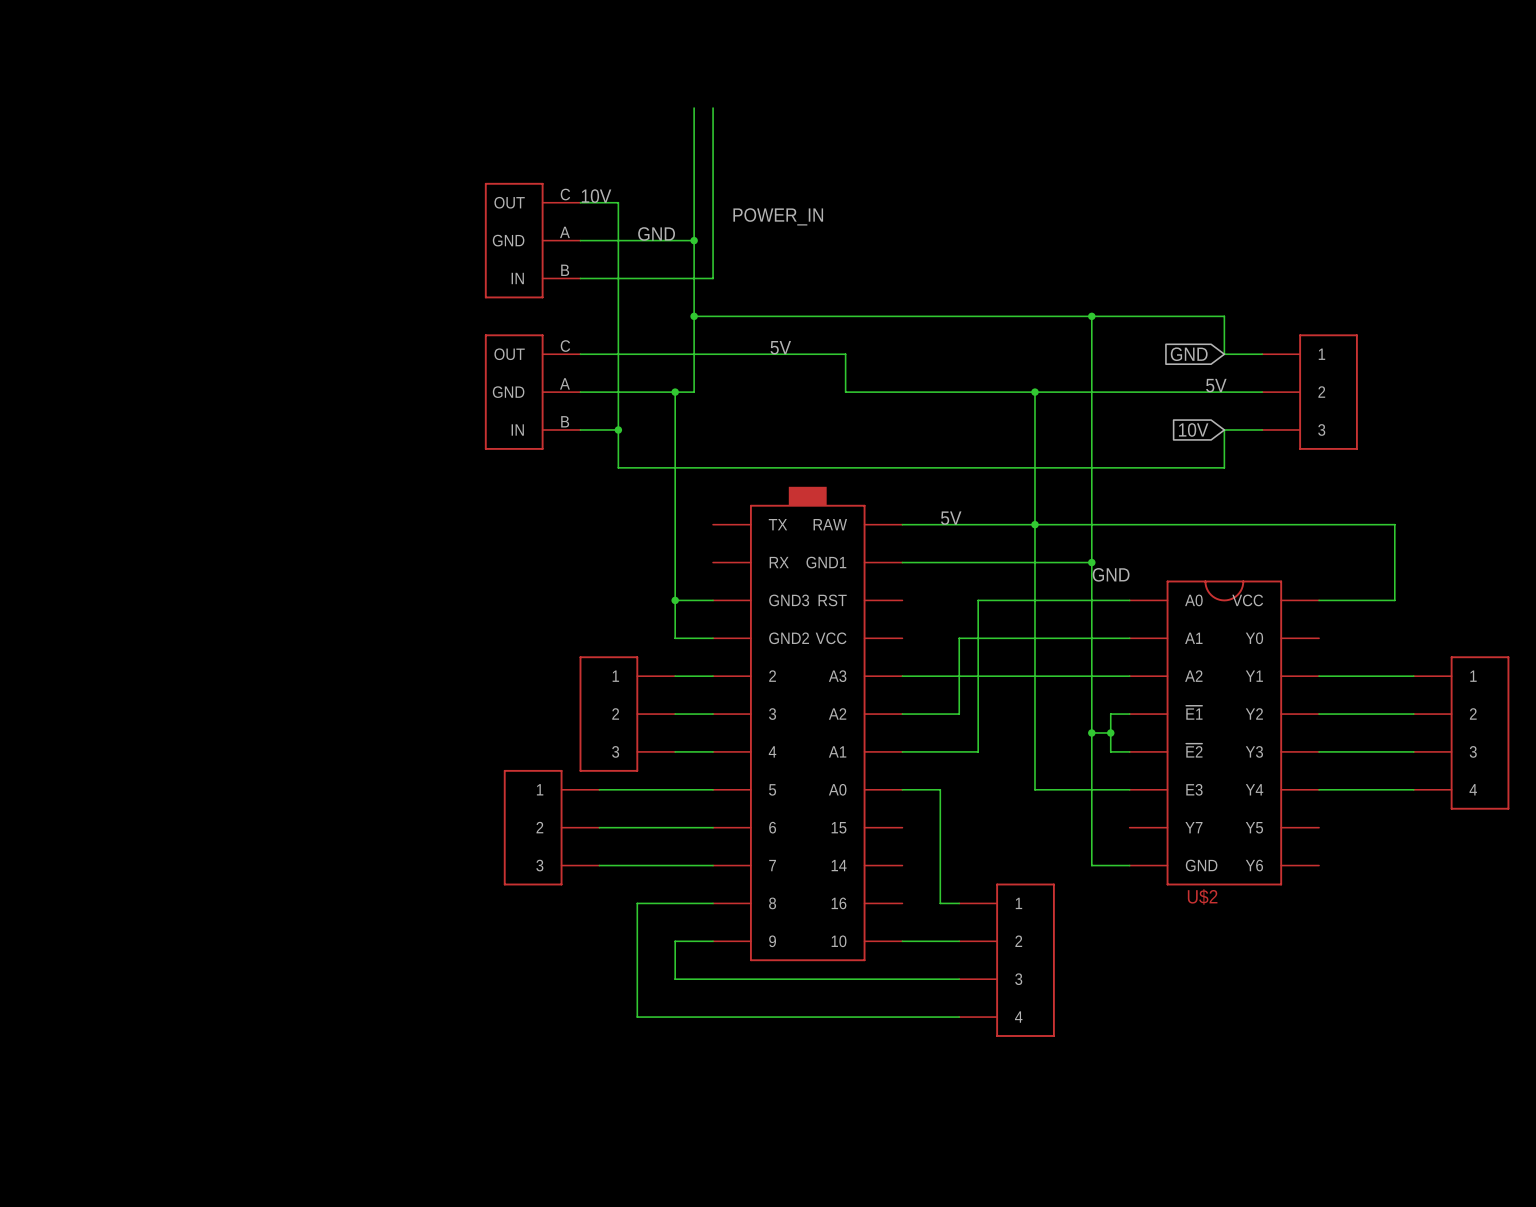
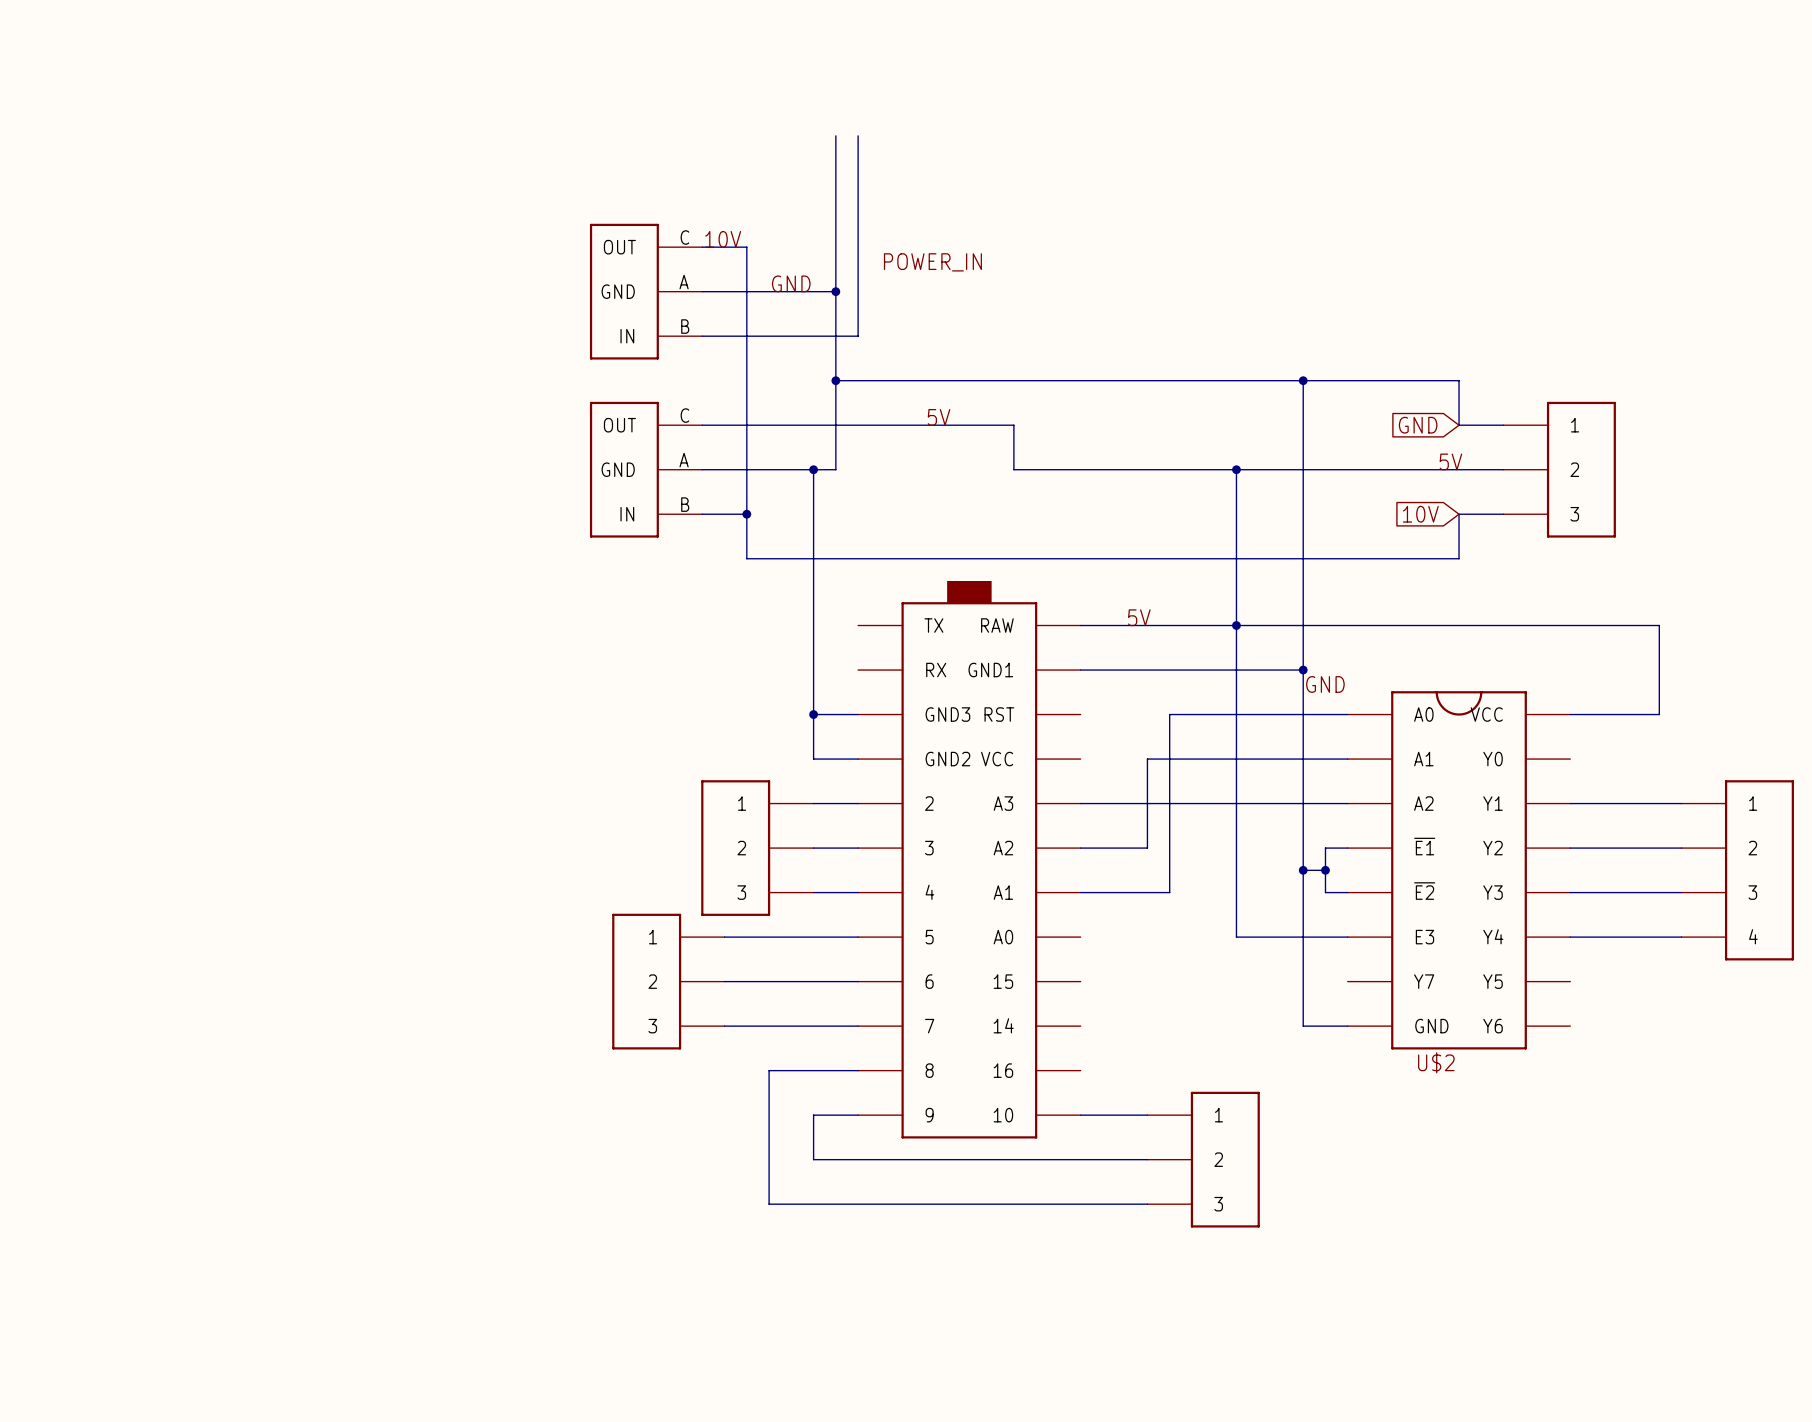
wire: (902, 789) (940, 789) (940, 903) (959, 903) -> none
part: (1007, 960) -> none
part: none -> (1203, 1159)

